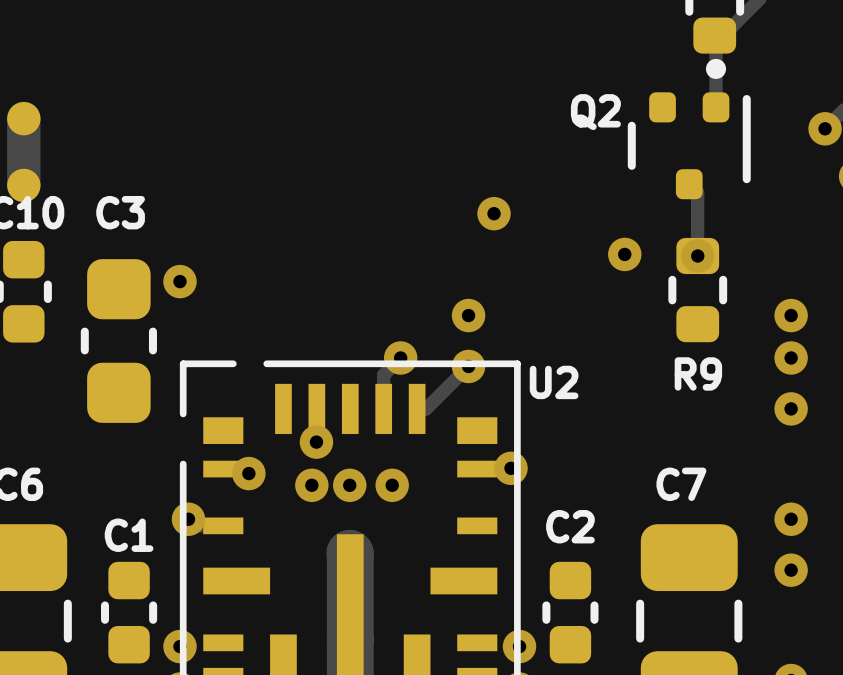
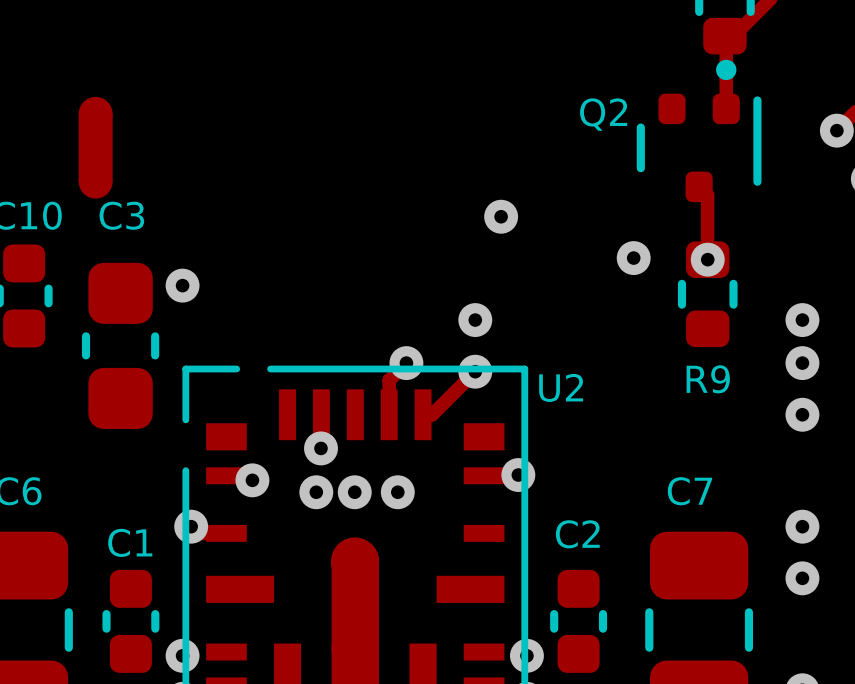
part position: (23, 152) -> (95, 147)

